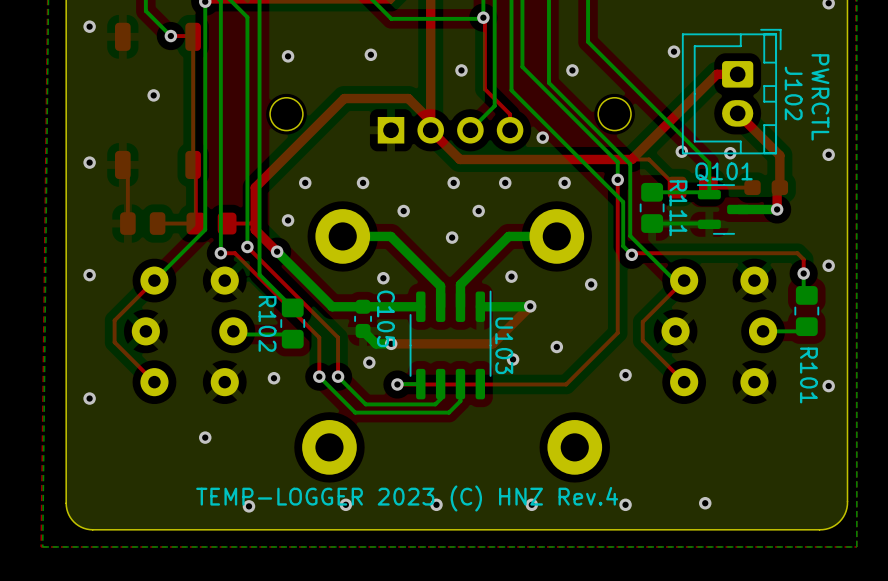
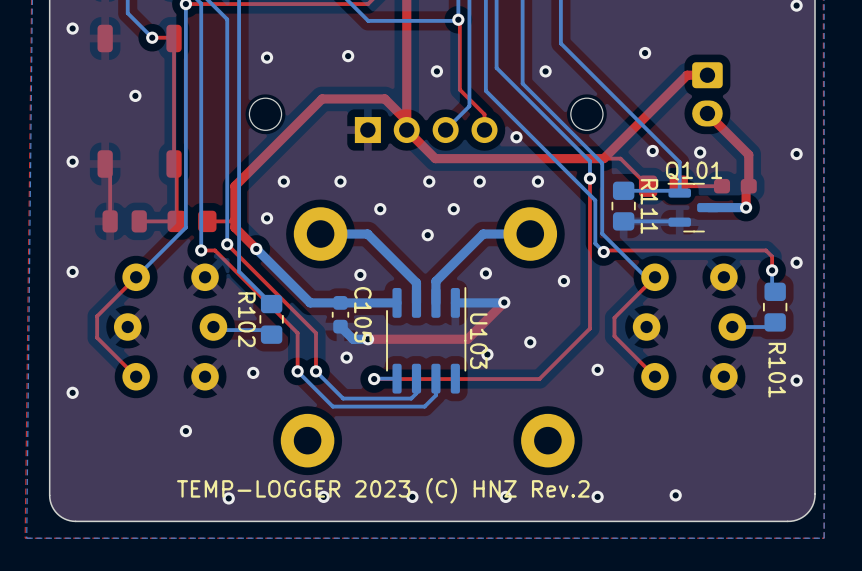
J102 side: bottom (731, 91) -> top (707, 94)
text: PWRCTL (820, 97) -> none
text: TEMP-LOGGER 2023 (C) HNZ Rev.4 (407, 498) -> TEMP-LOGGER 2023 (C) HNZ Rev.2 (383, 490)

